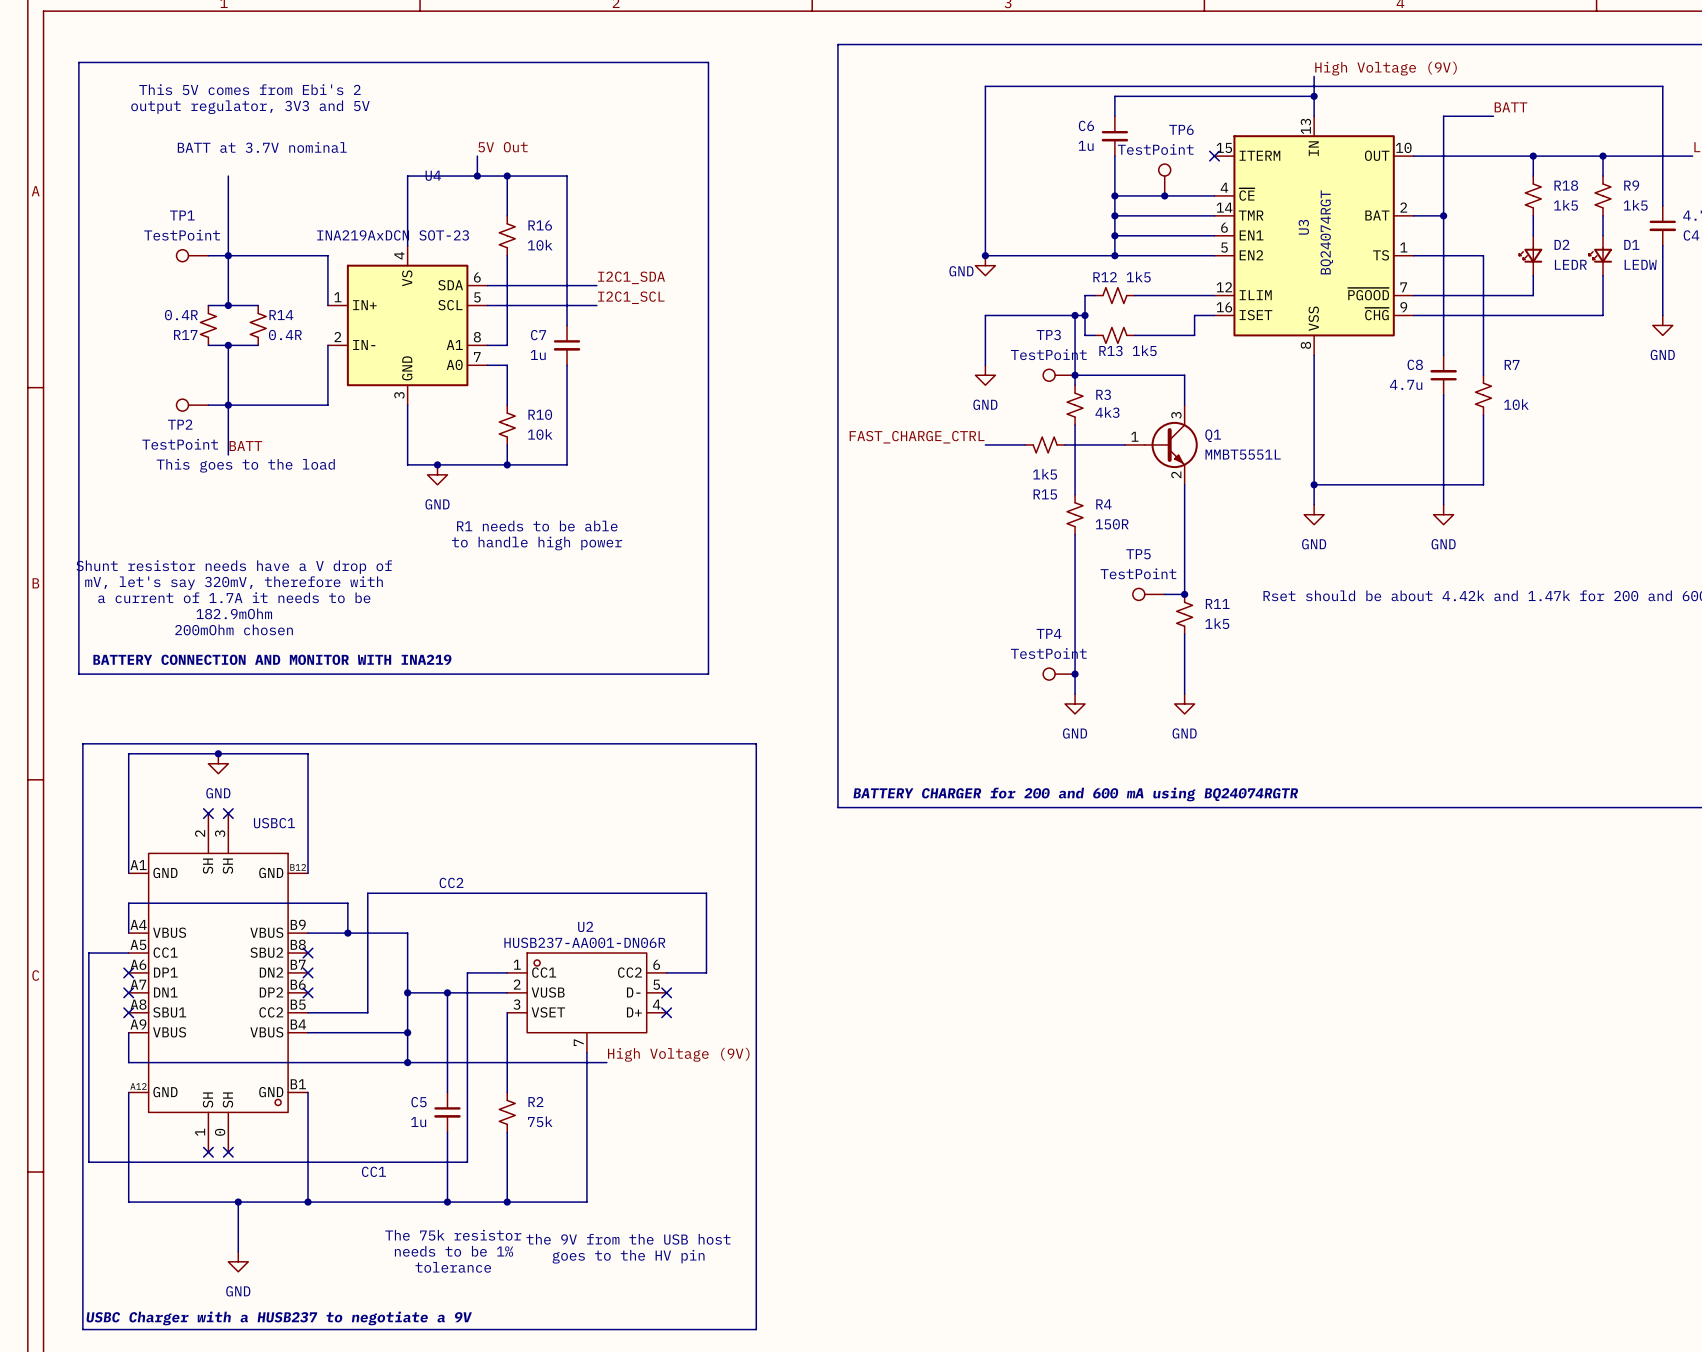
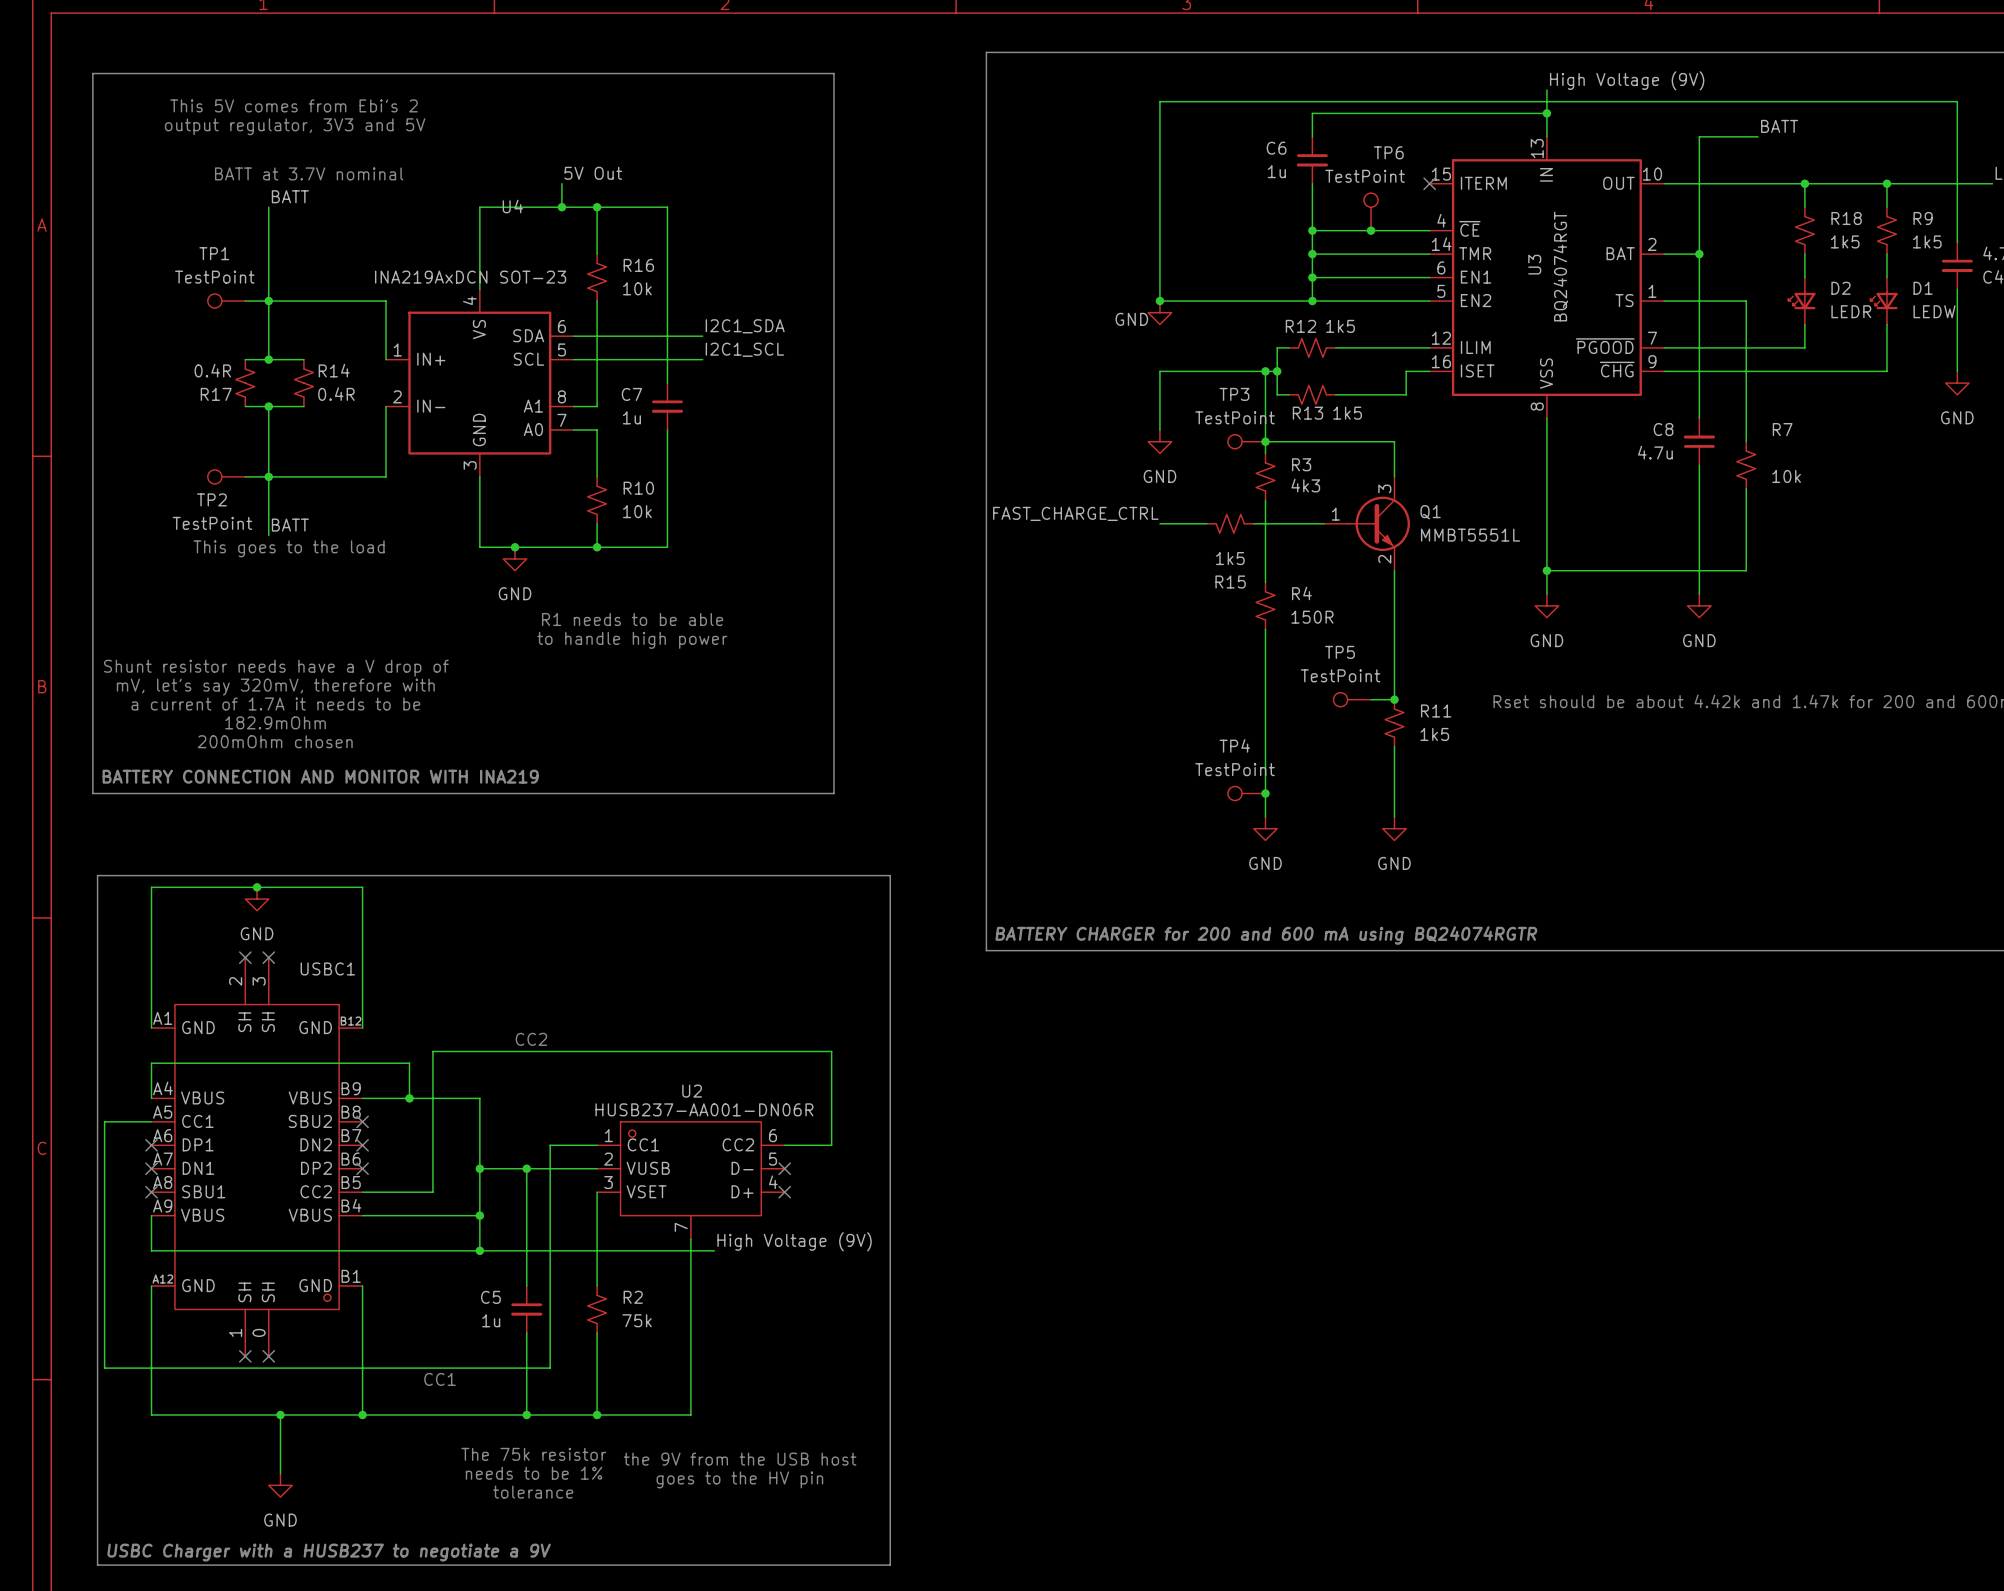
label: none -> BATT (290, 196)

